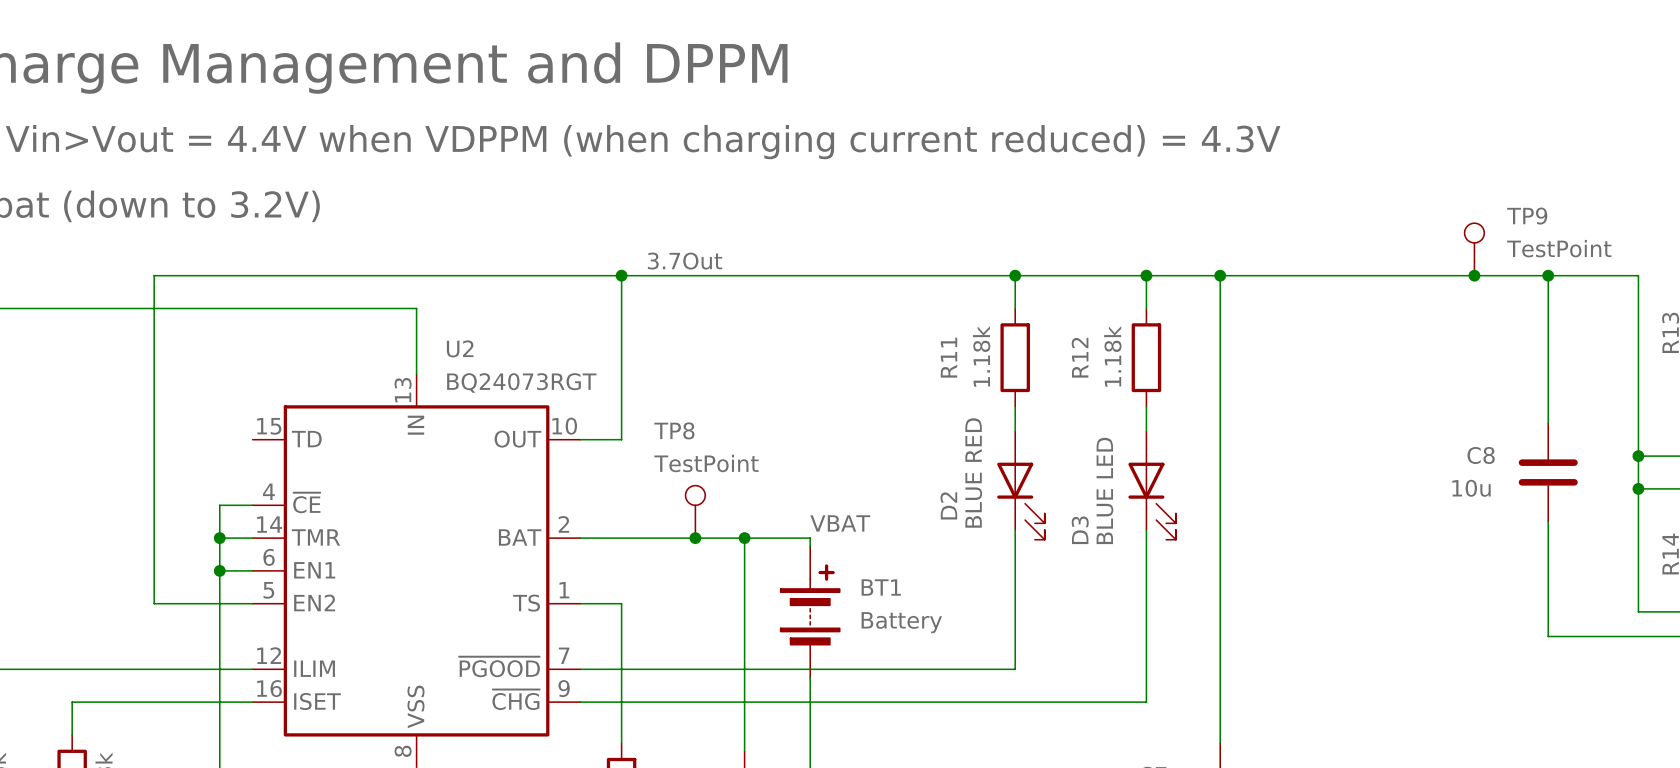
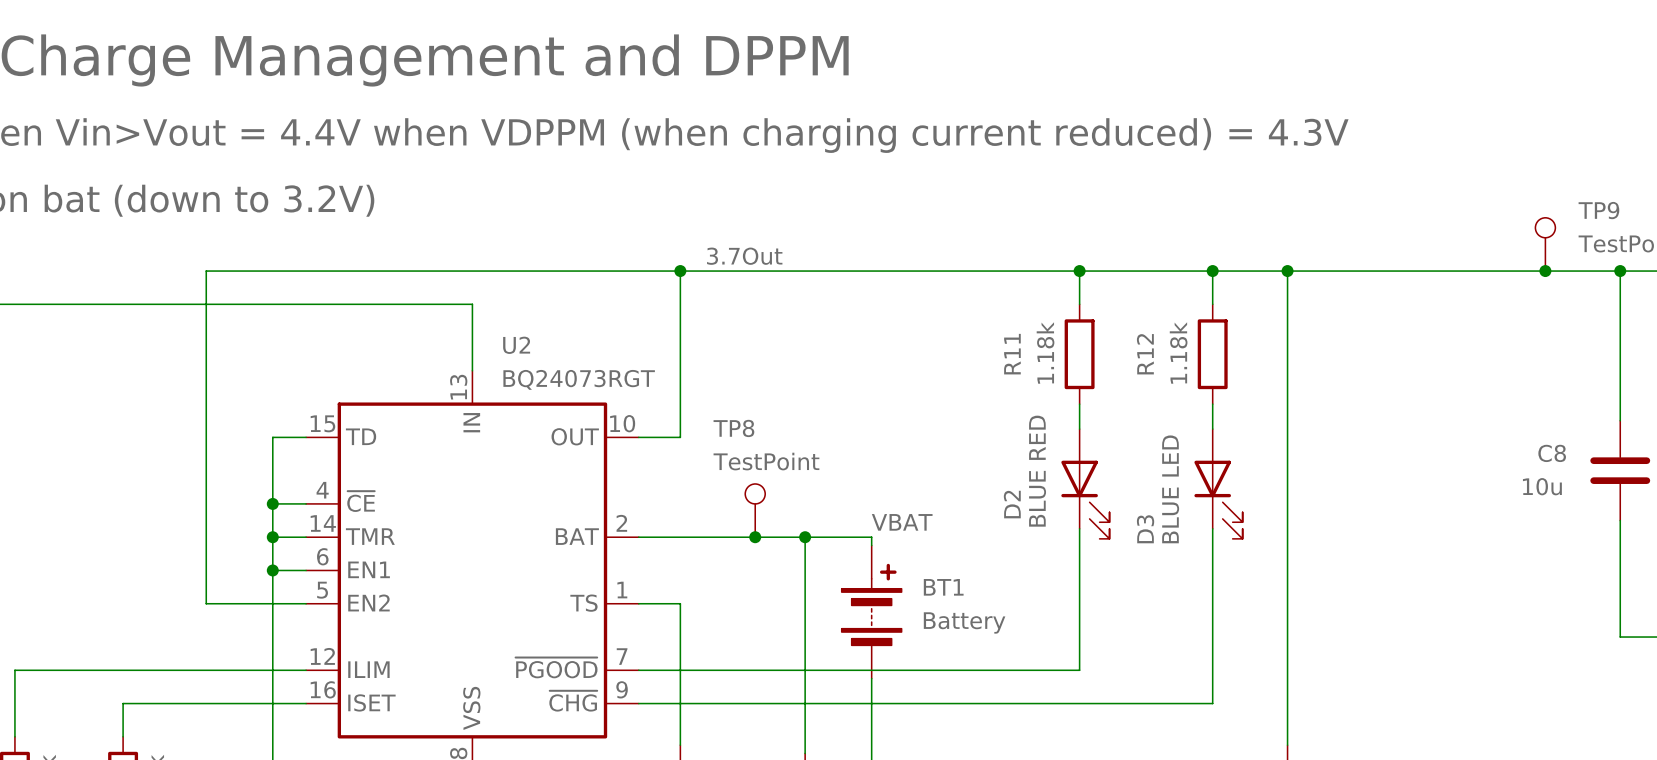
wire: none -> (306, 437) (272, 437) (272, 503)
junction: none -> (272, 503)

